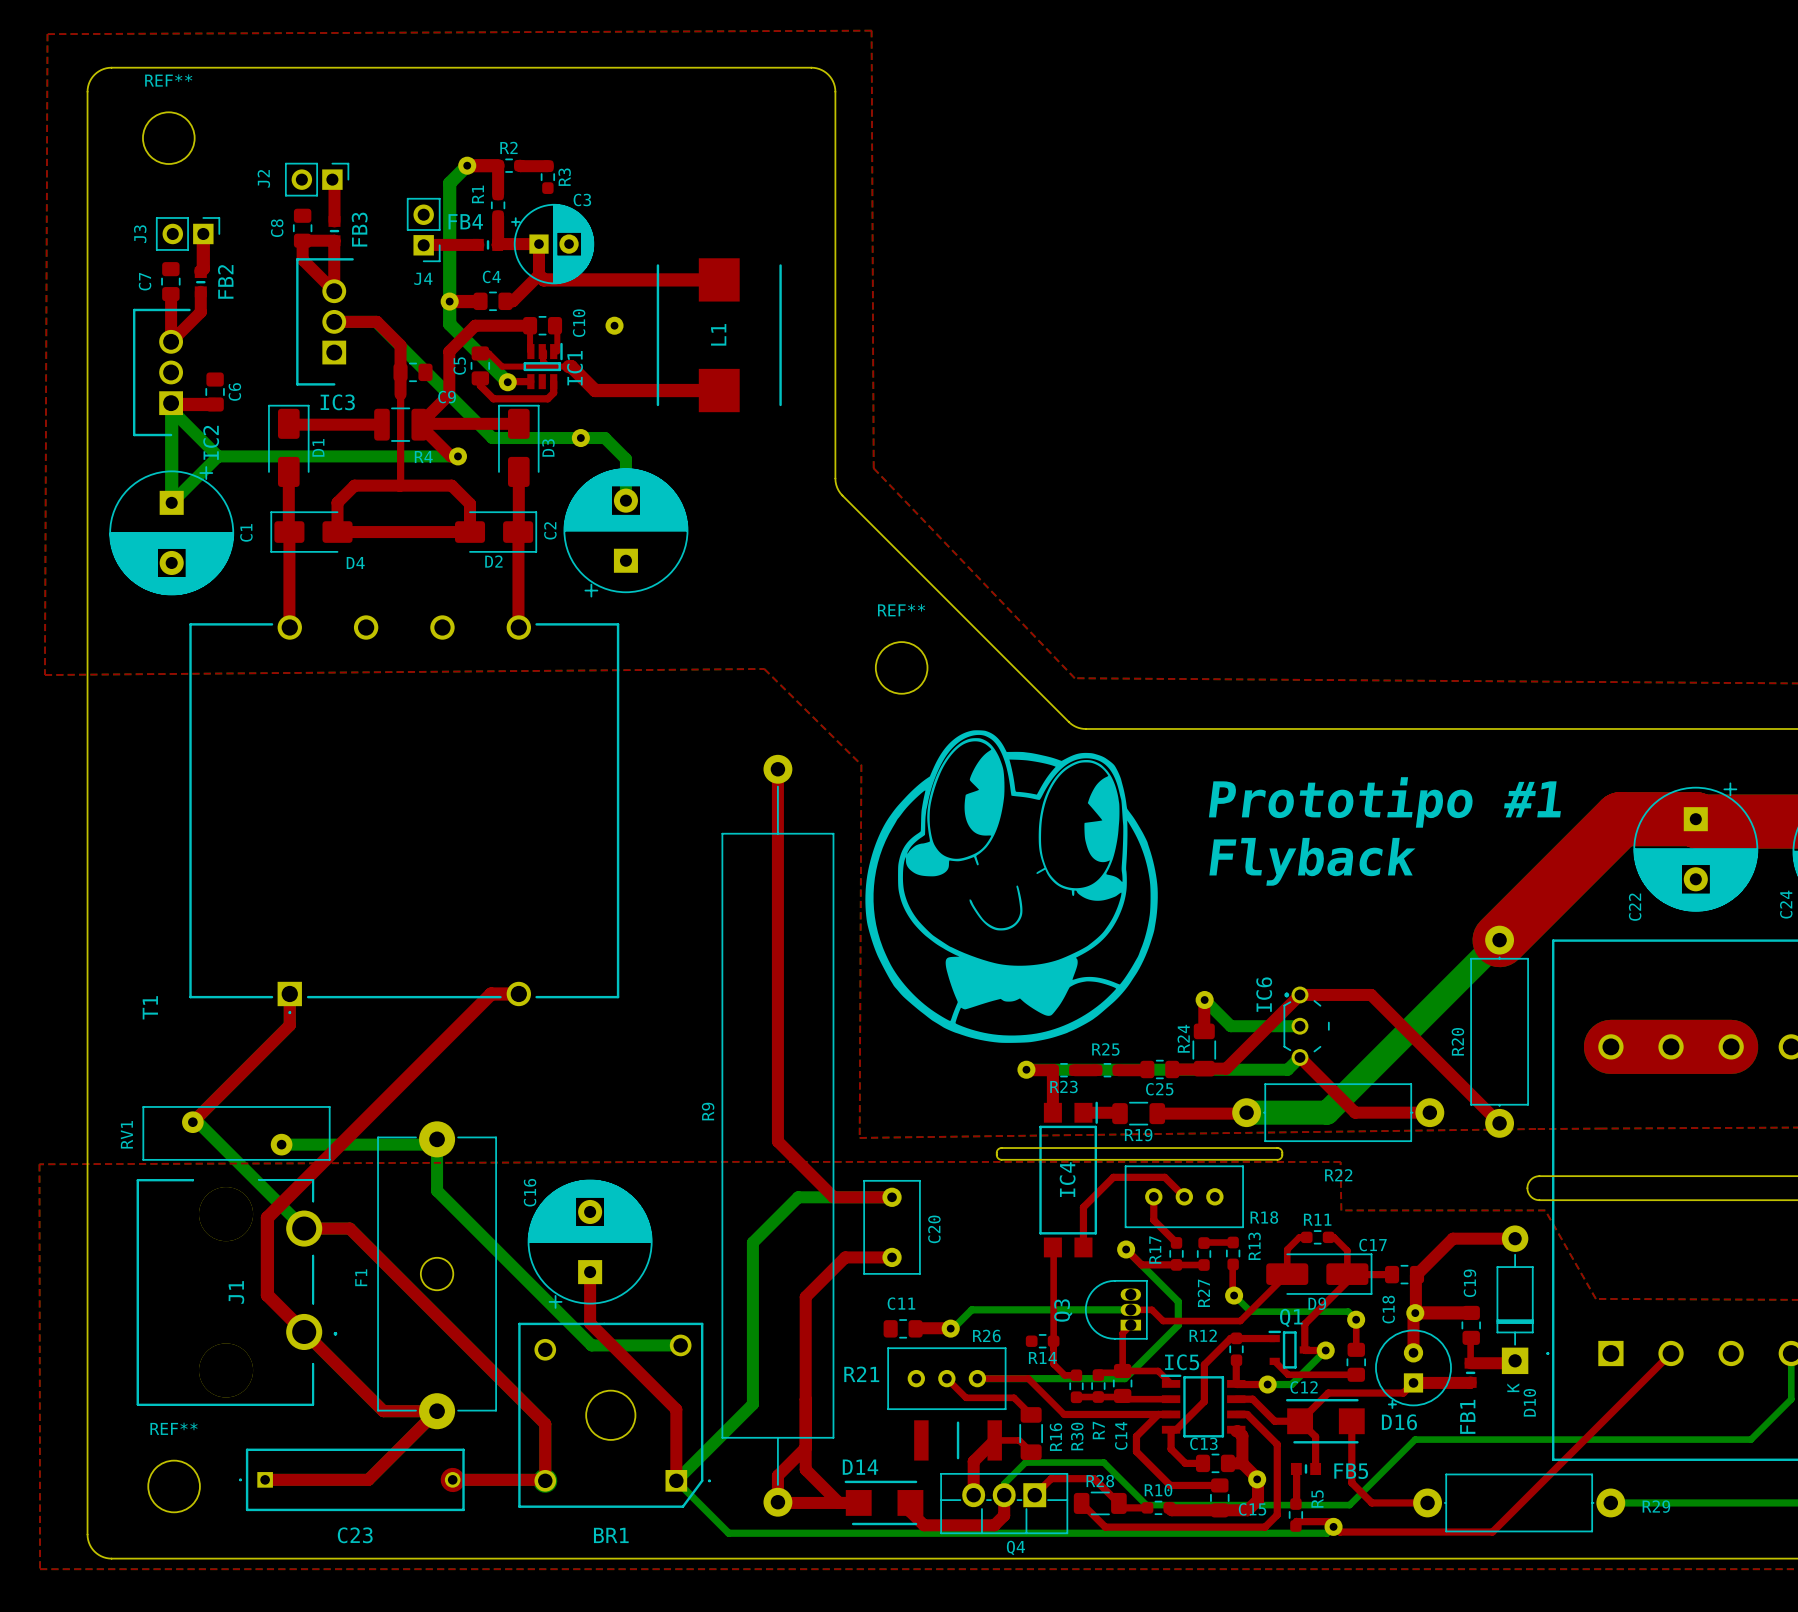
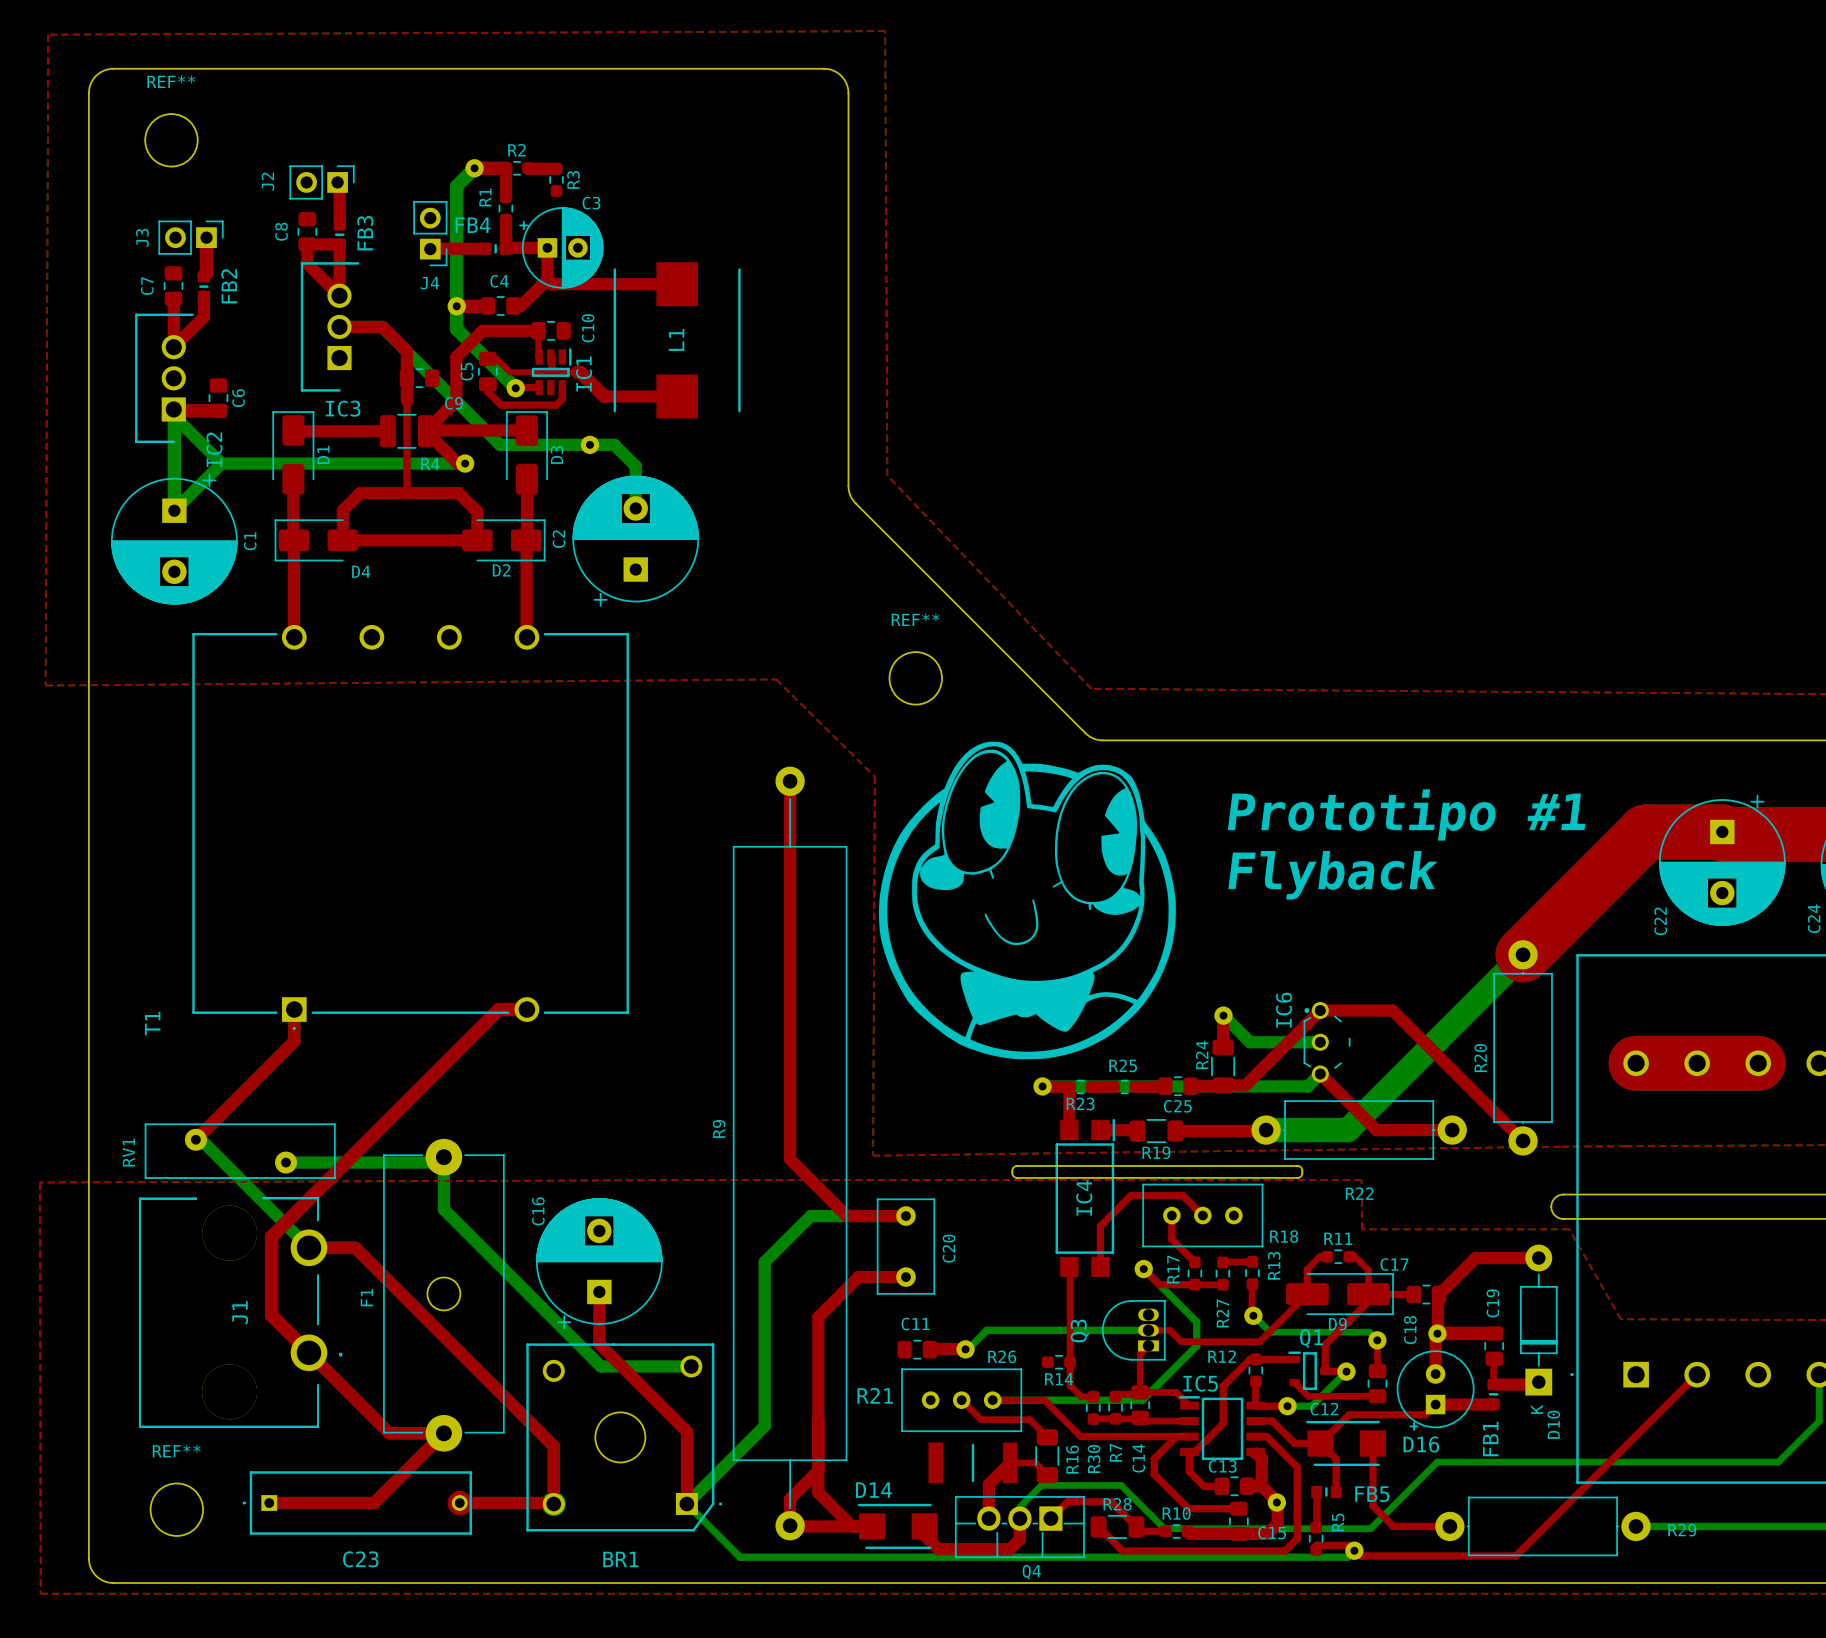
top track: (543, 279) (719, 279) -> (552, 284) (677, 284)
top track: (555, 325) (557, 328) (557, 351) -> none
part: (614, 325) -> none
L1 position: (719, 335) -> (677, 340)
top track: (595, 390) (719, 390) -> (604, 396) (677, 396)

